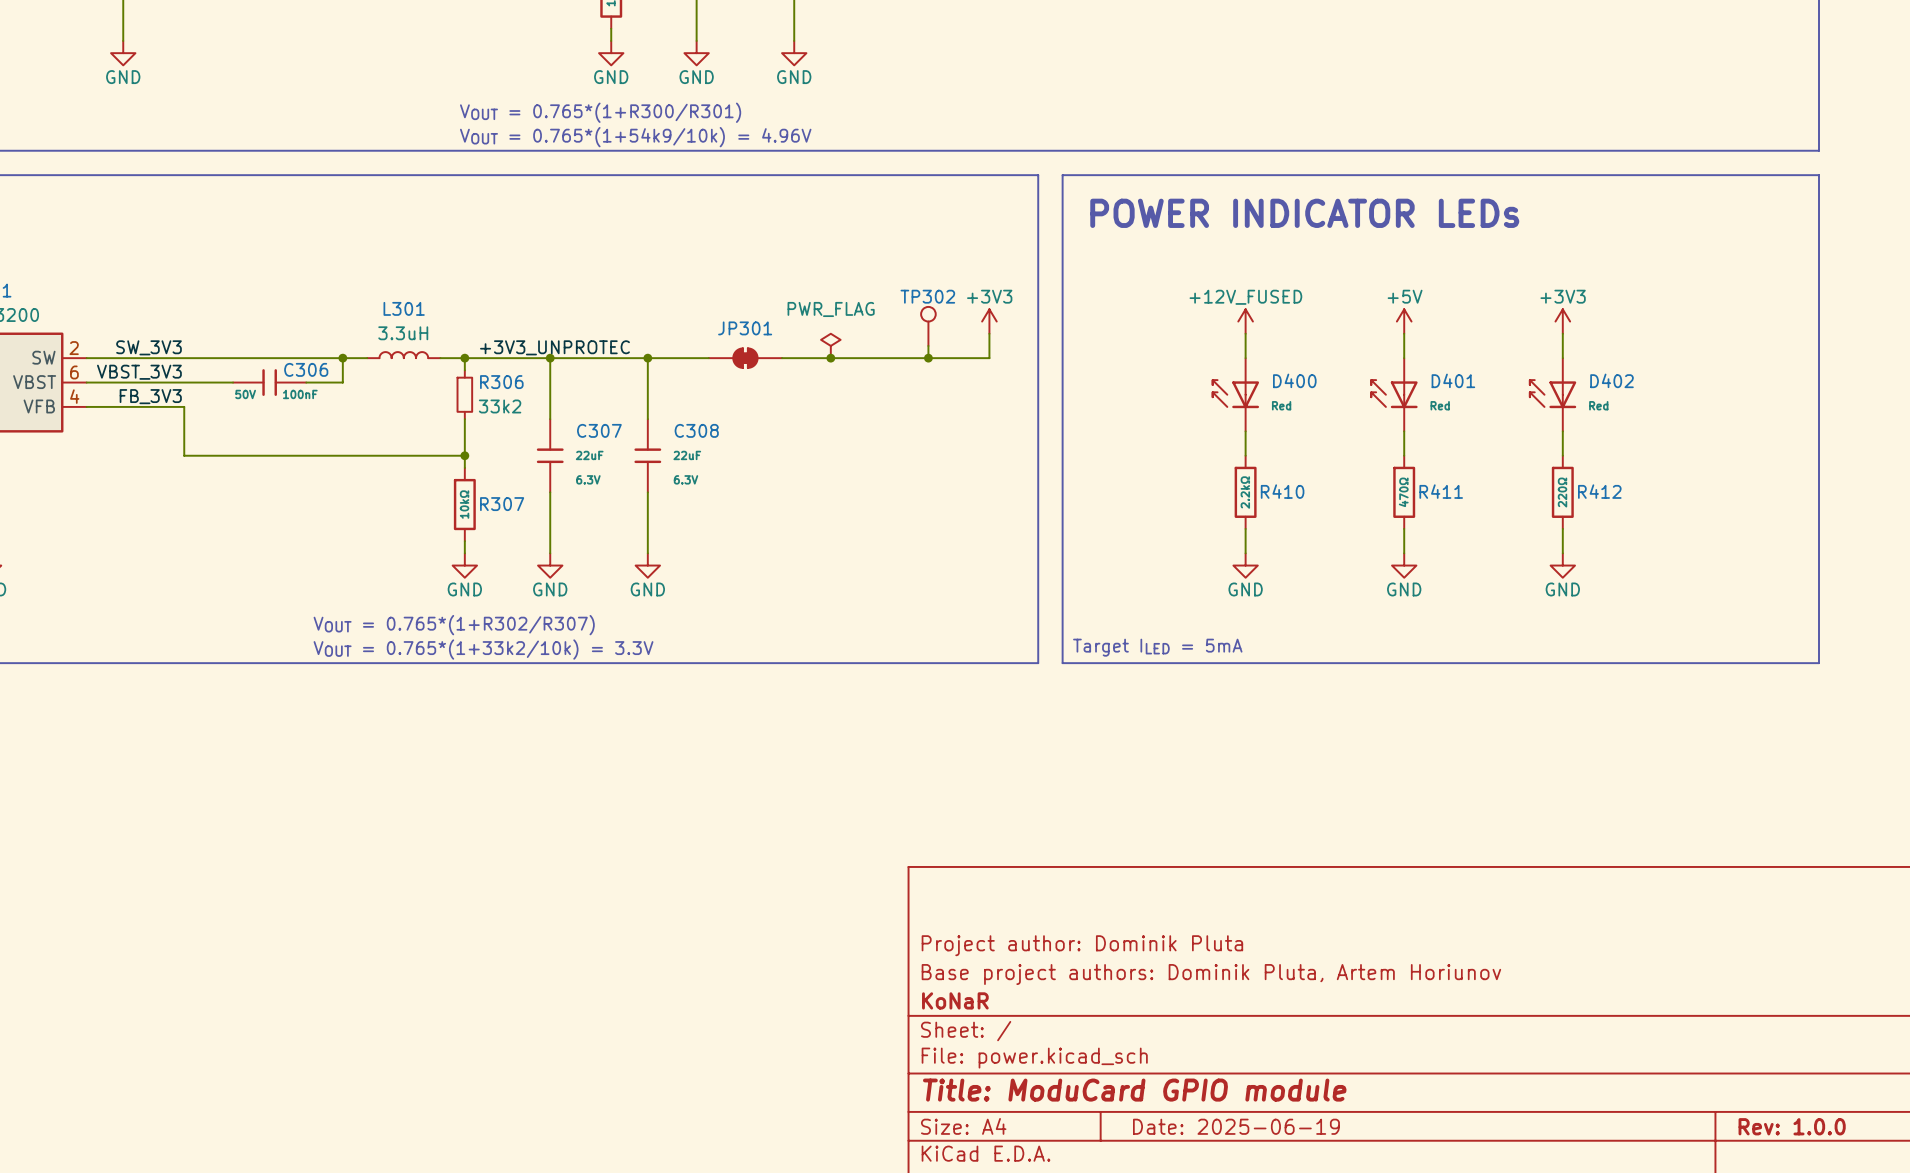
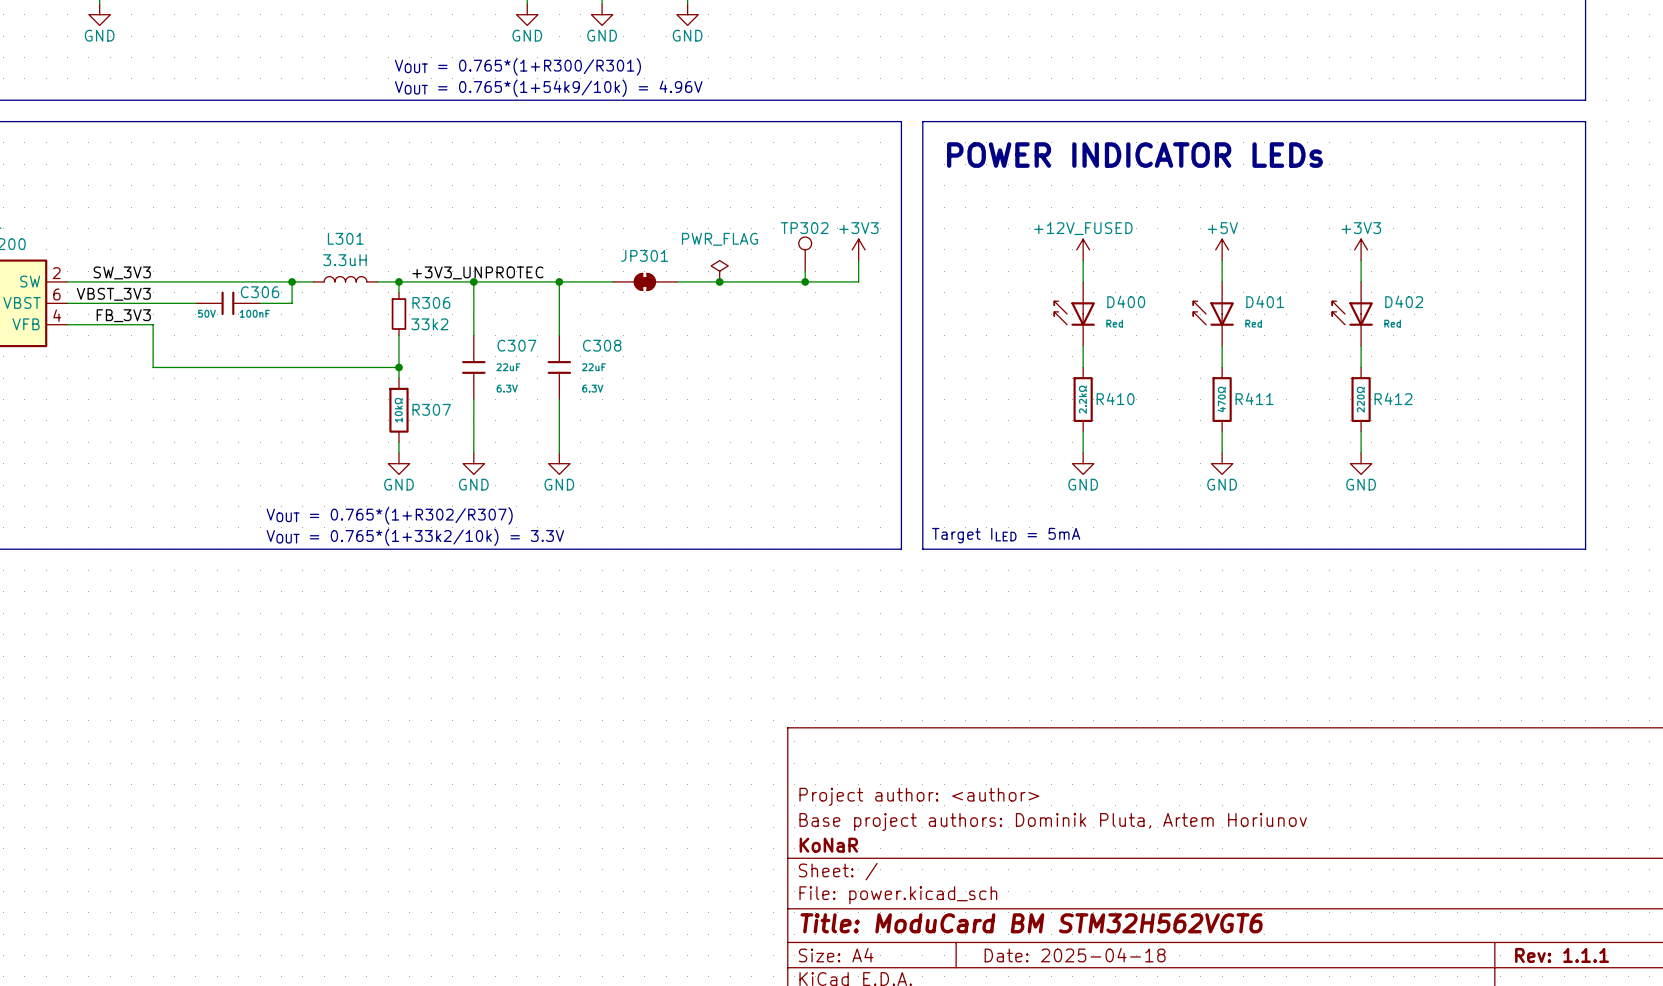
title block: Project author: Dominik Pluta (1082, 945) -> Project author: <author> (919, 796)
title block: Title: ModuCard GPIO module (1134, 1090) -> Title: ModuCard BM STM32H562VGT6 (1031, 923)
title block: Date: 2025-06-19 (1236, 1126) -> Date: 2025-04-18 (1075, 955)
title block: Rev: 1.0.0 (1792, 1126) -> Rev: 1.1.1 (1562, 955)

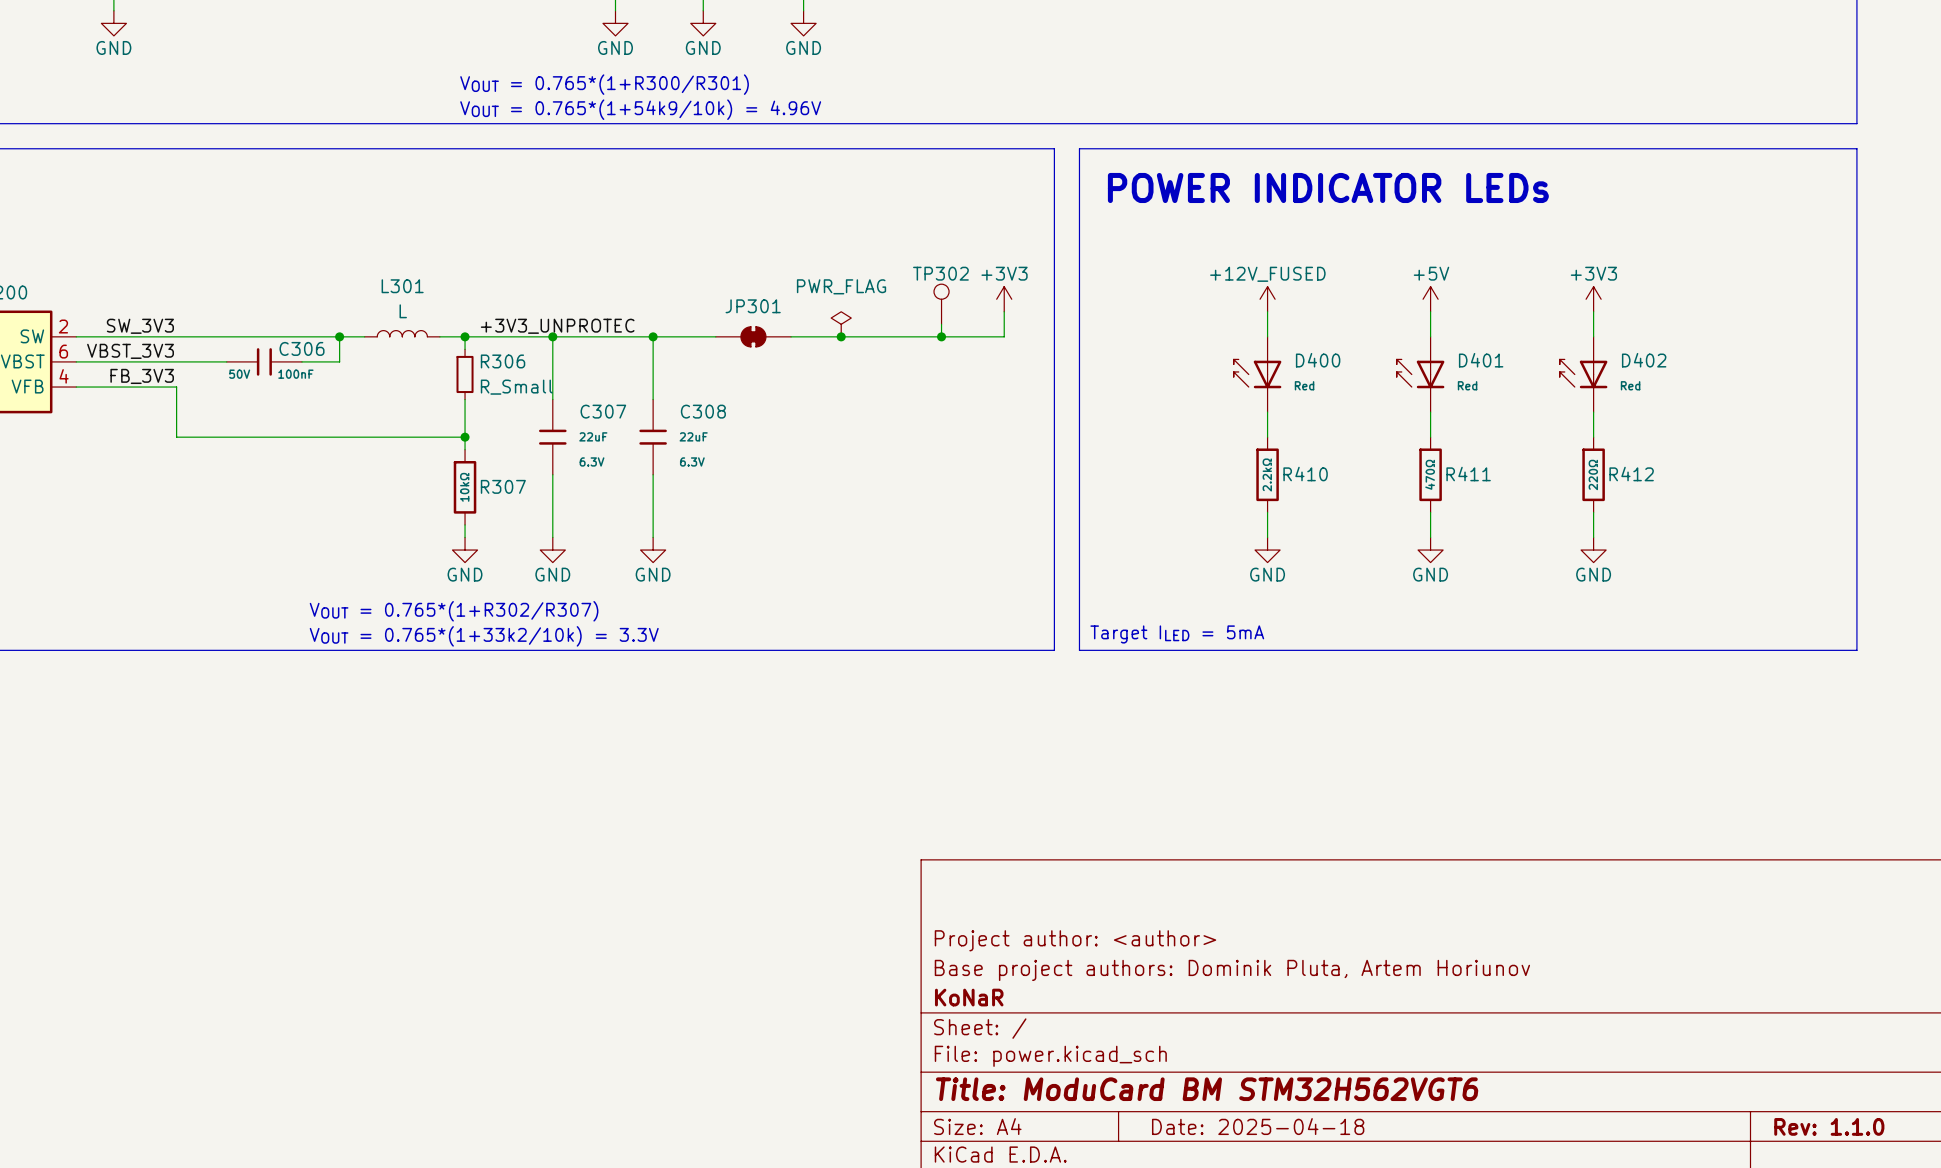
L301 value: 3.3uH (345, 260) -> L (403, 311)
R306 value: 33k2 (429, 324) -> R_Small (516, 387)
title block: Rev: 1.1.1 (1562, 955) -> Rev: 1.1.0 (1829, 1126)

